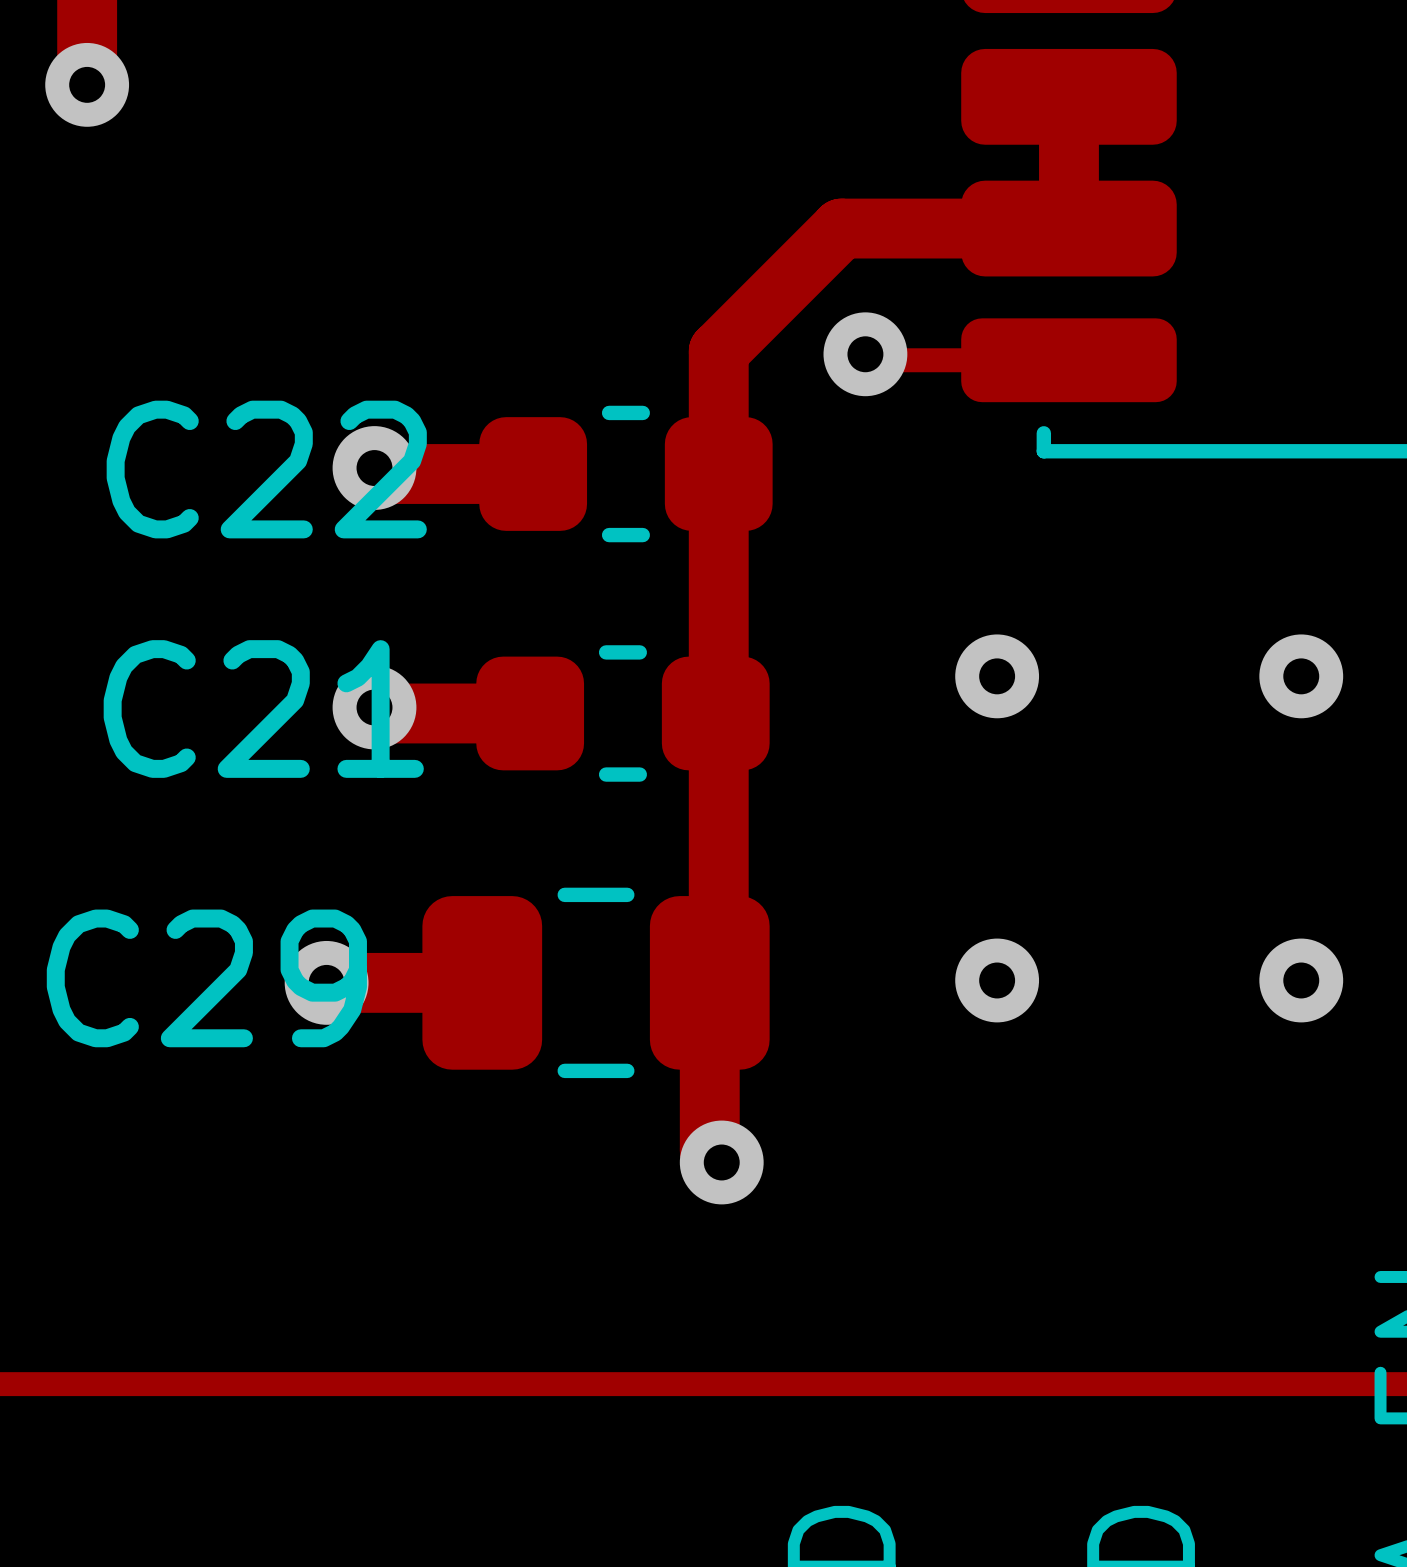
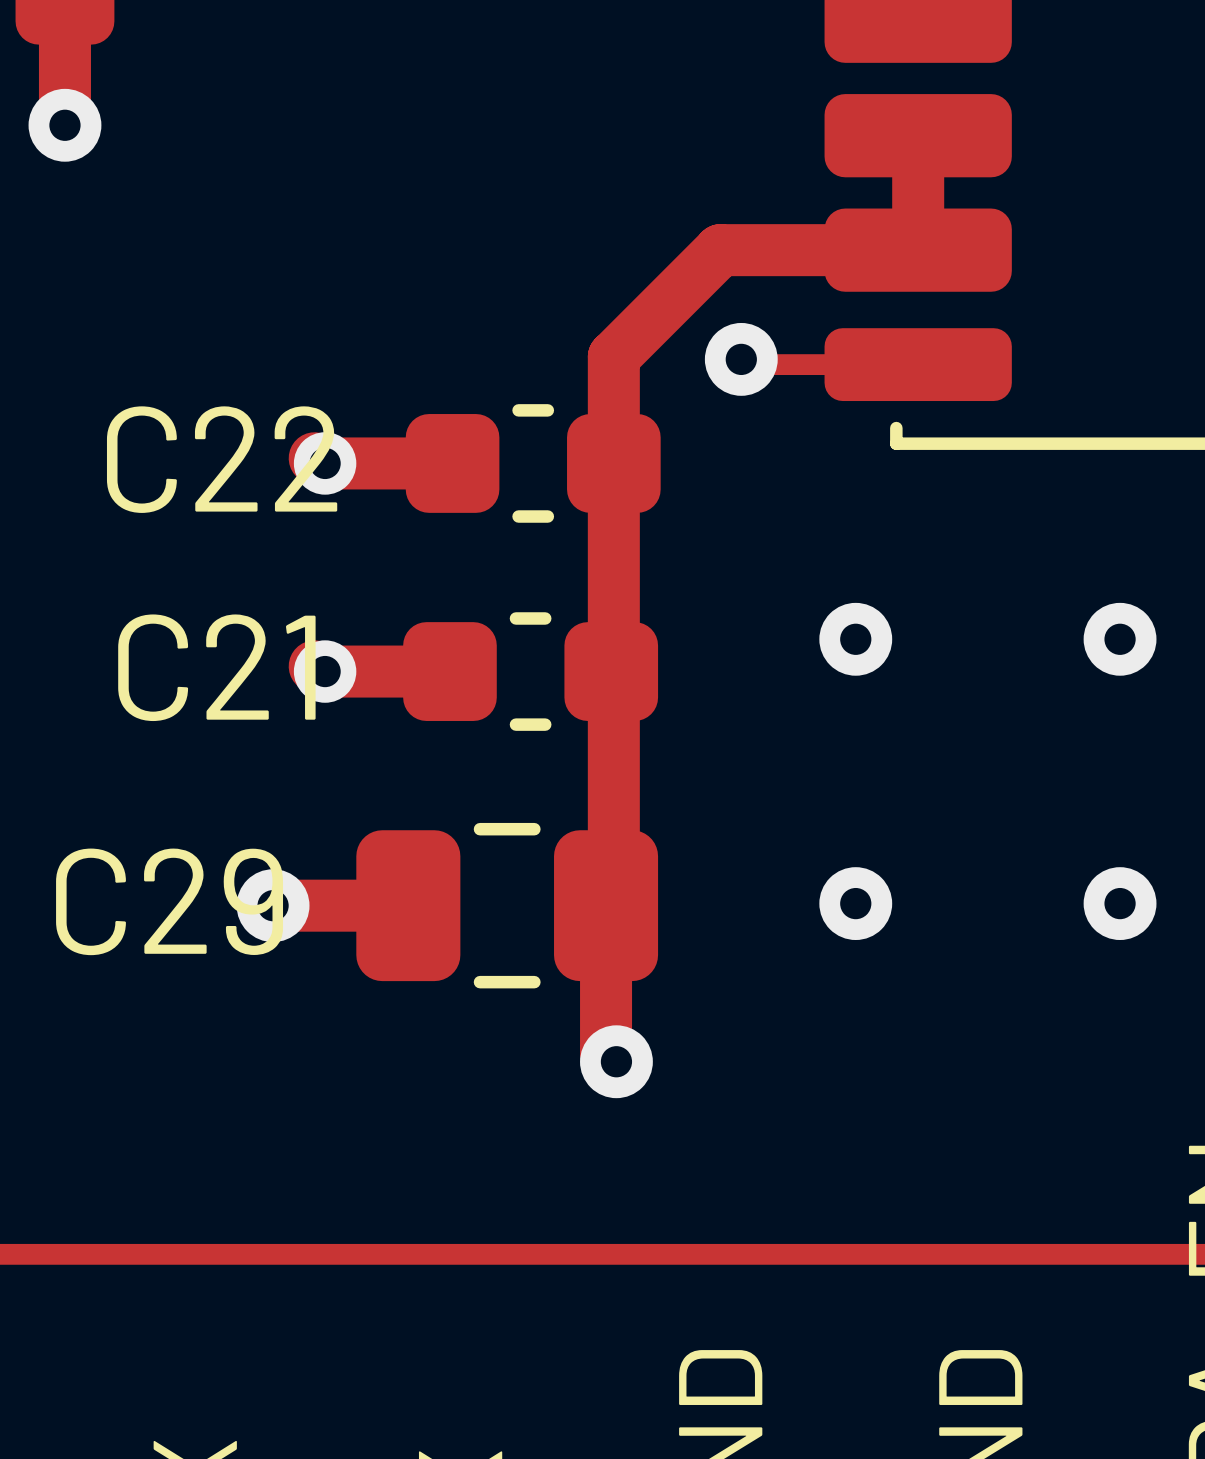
via size: [332, 426, 417, 510] -> [293, 432, 357, 495]
via size: [332, 665, 417, 750] -> [293, 640, 357, 703]

